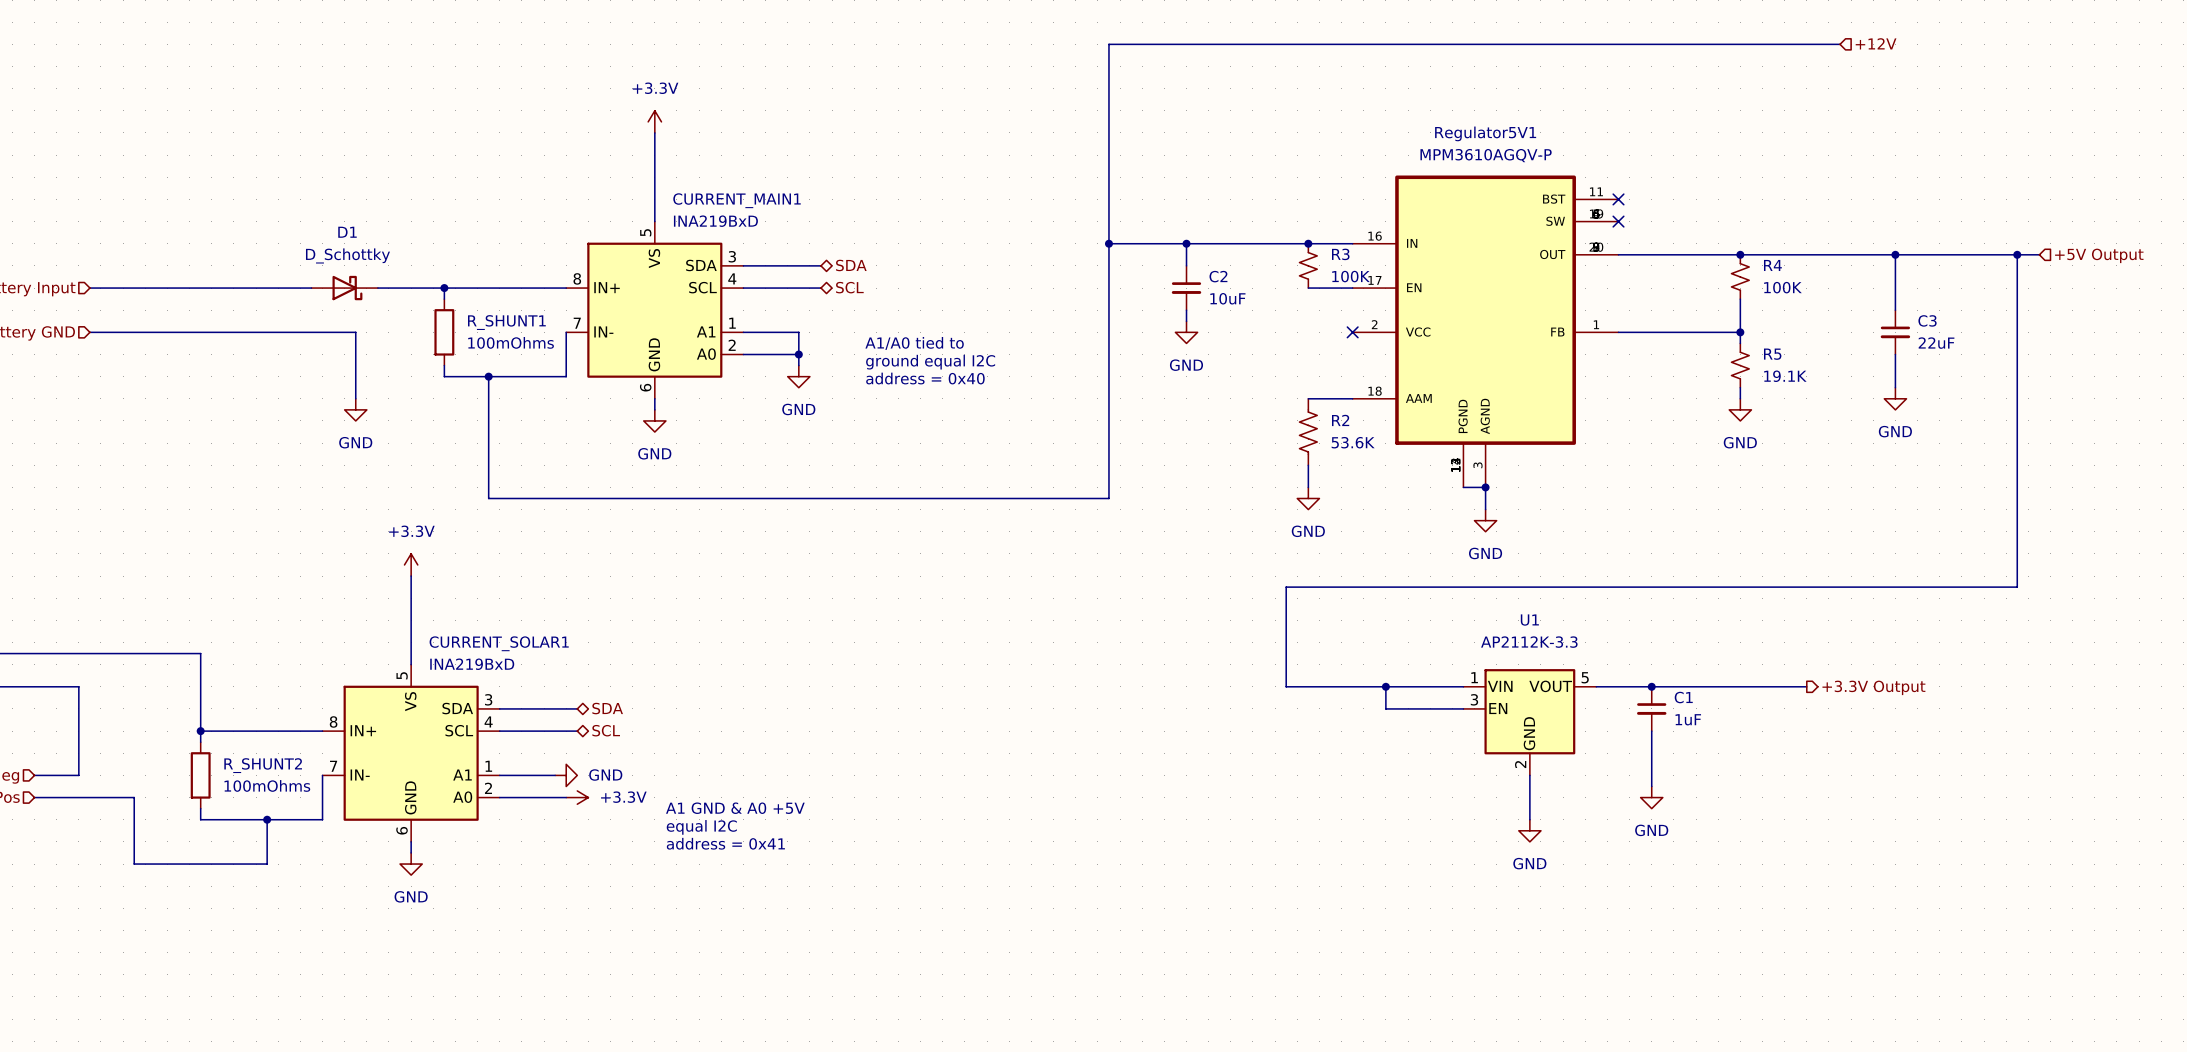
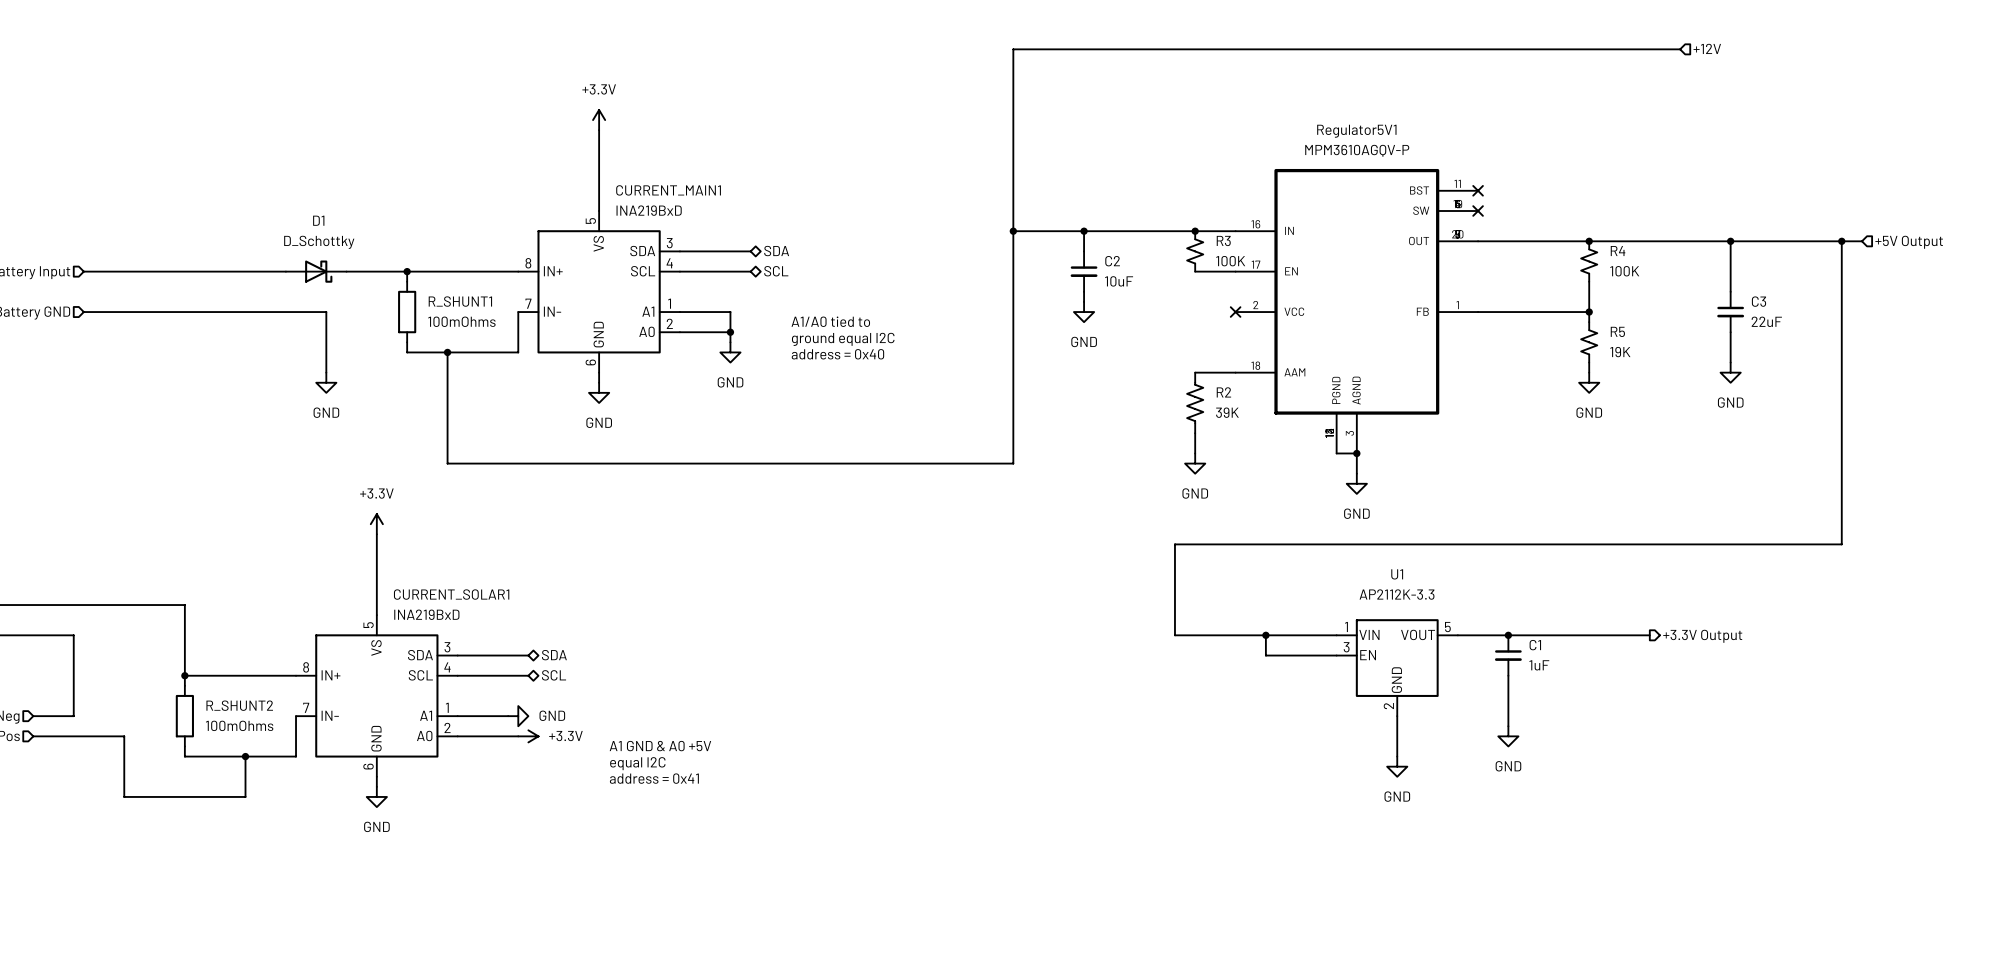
R5 value: 19.1K (1785, 376) -> 19K (1620, 352)
R2 value: 53.6K (1353, 442) -> 39K (1227, 412)

